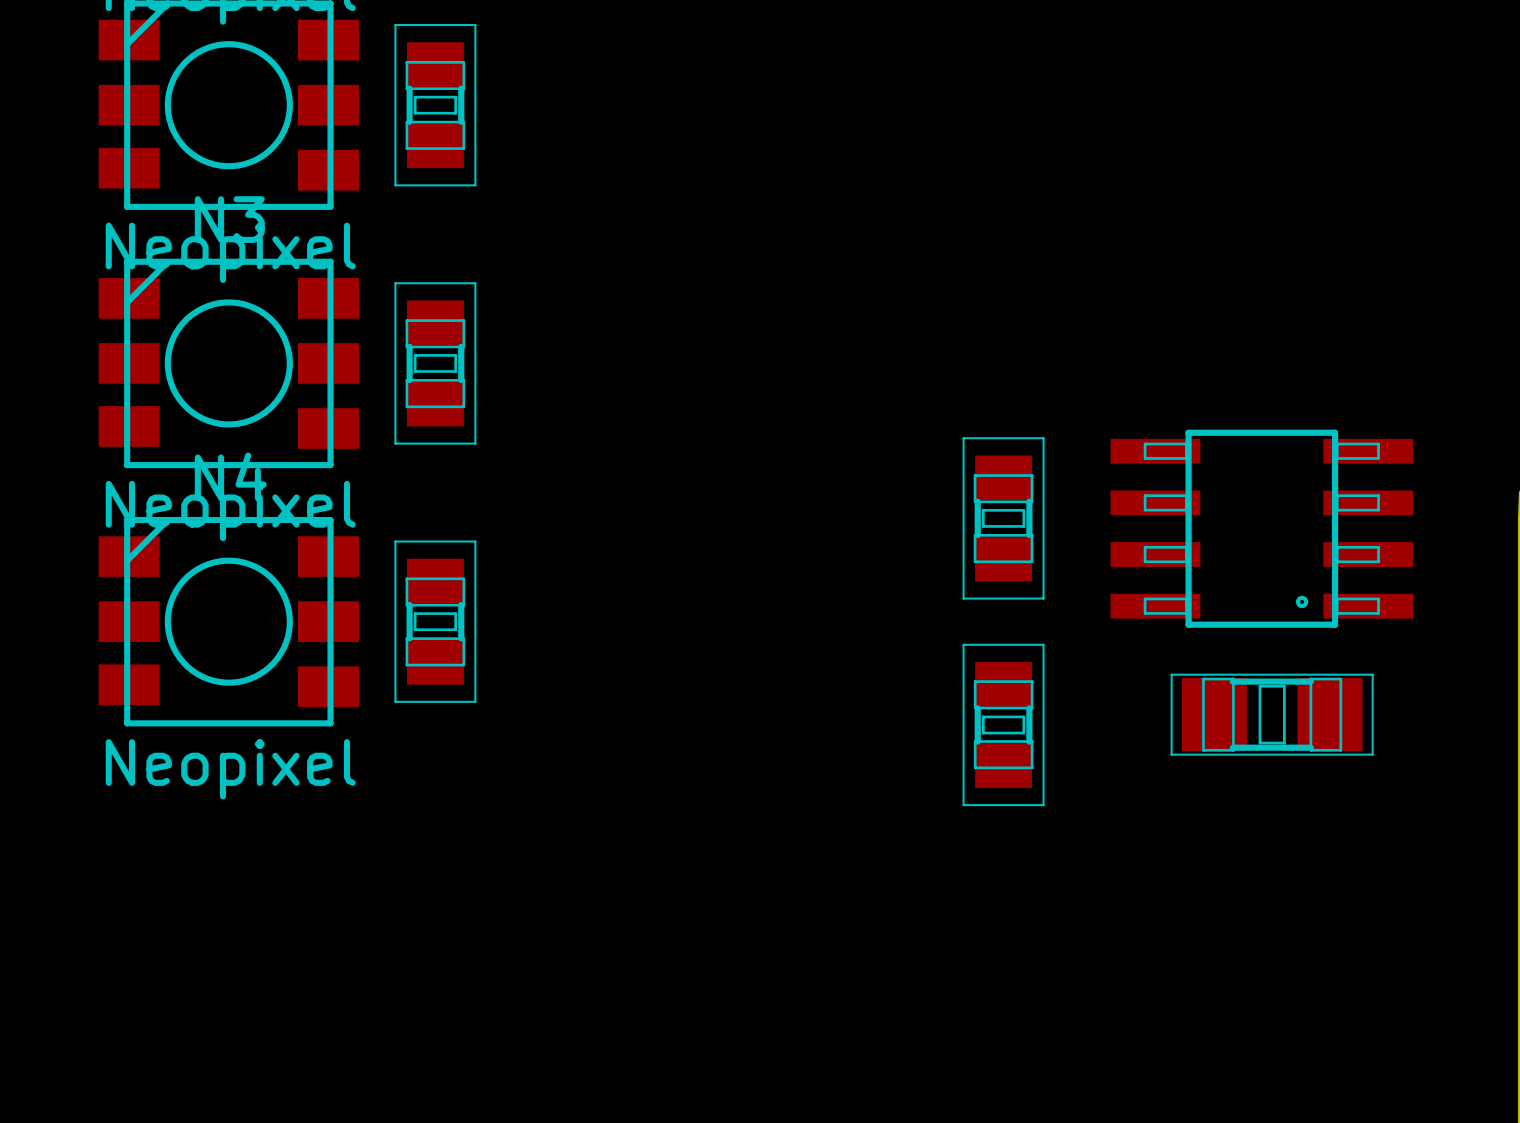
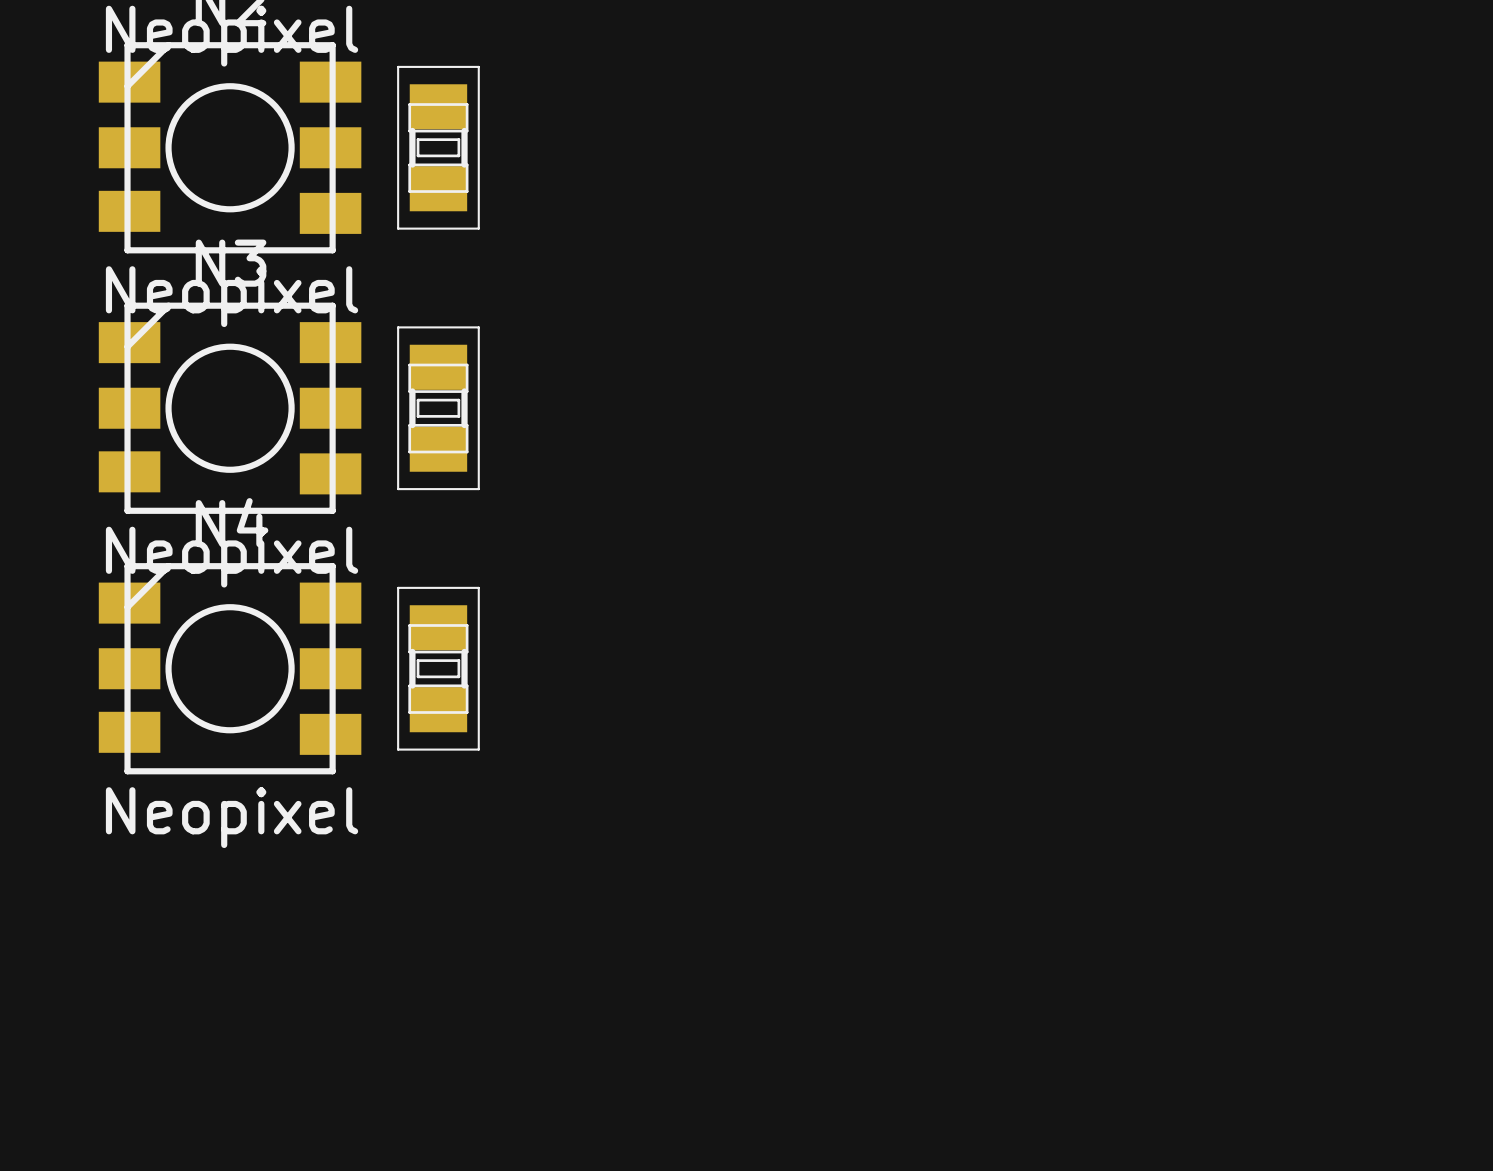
part: (1003, 518) -> none
part: (1261, 528) -> none
part: (1272, 714) -> none
part: (1003, 724) -> none

